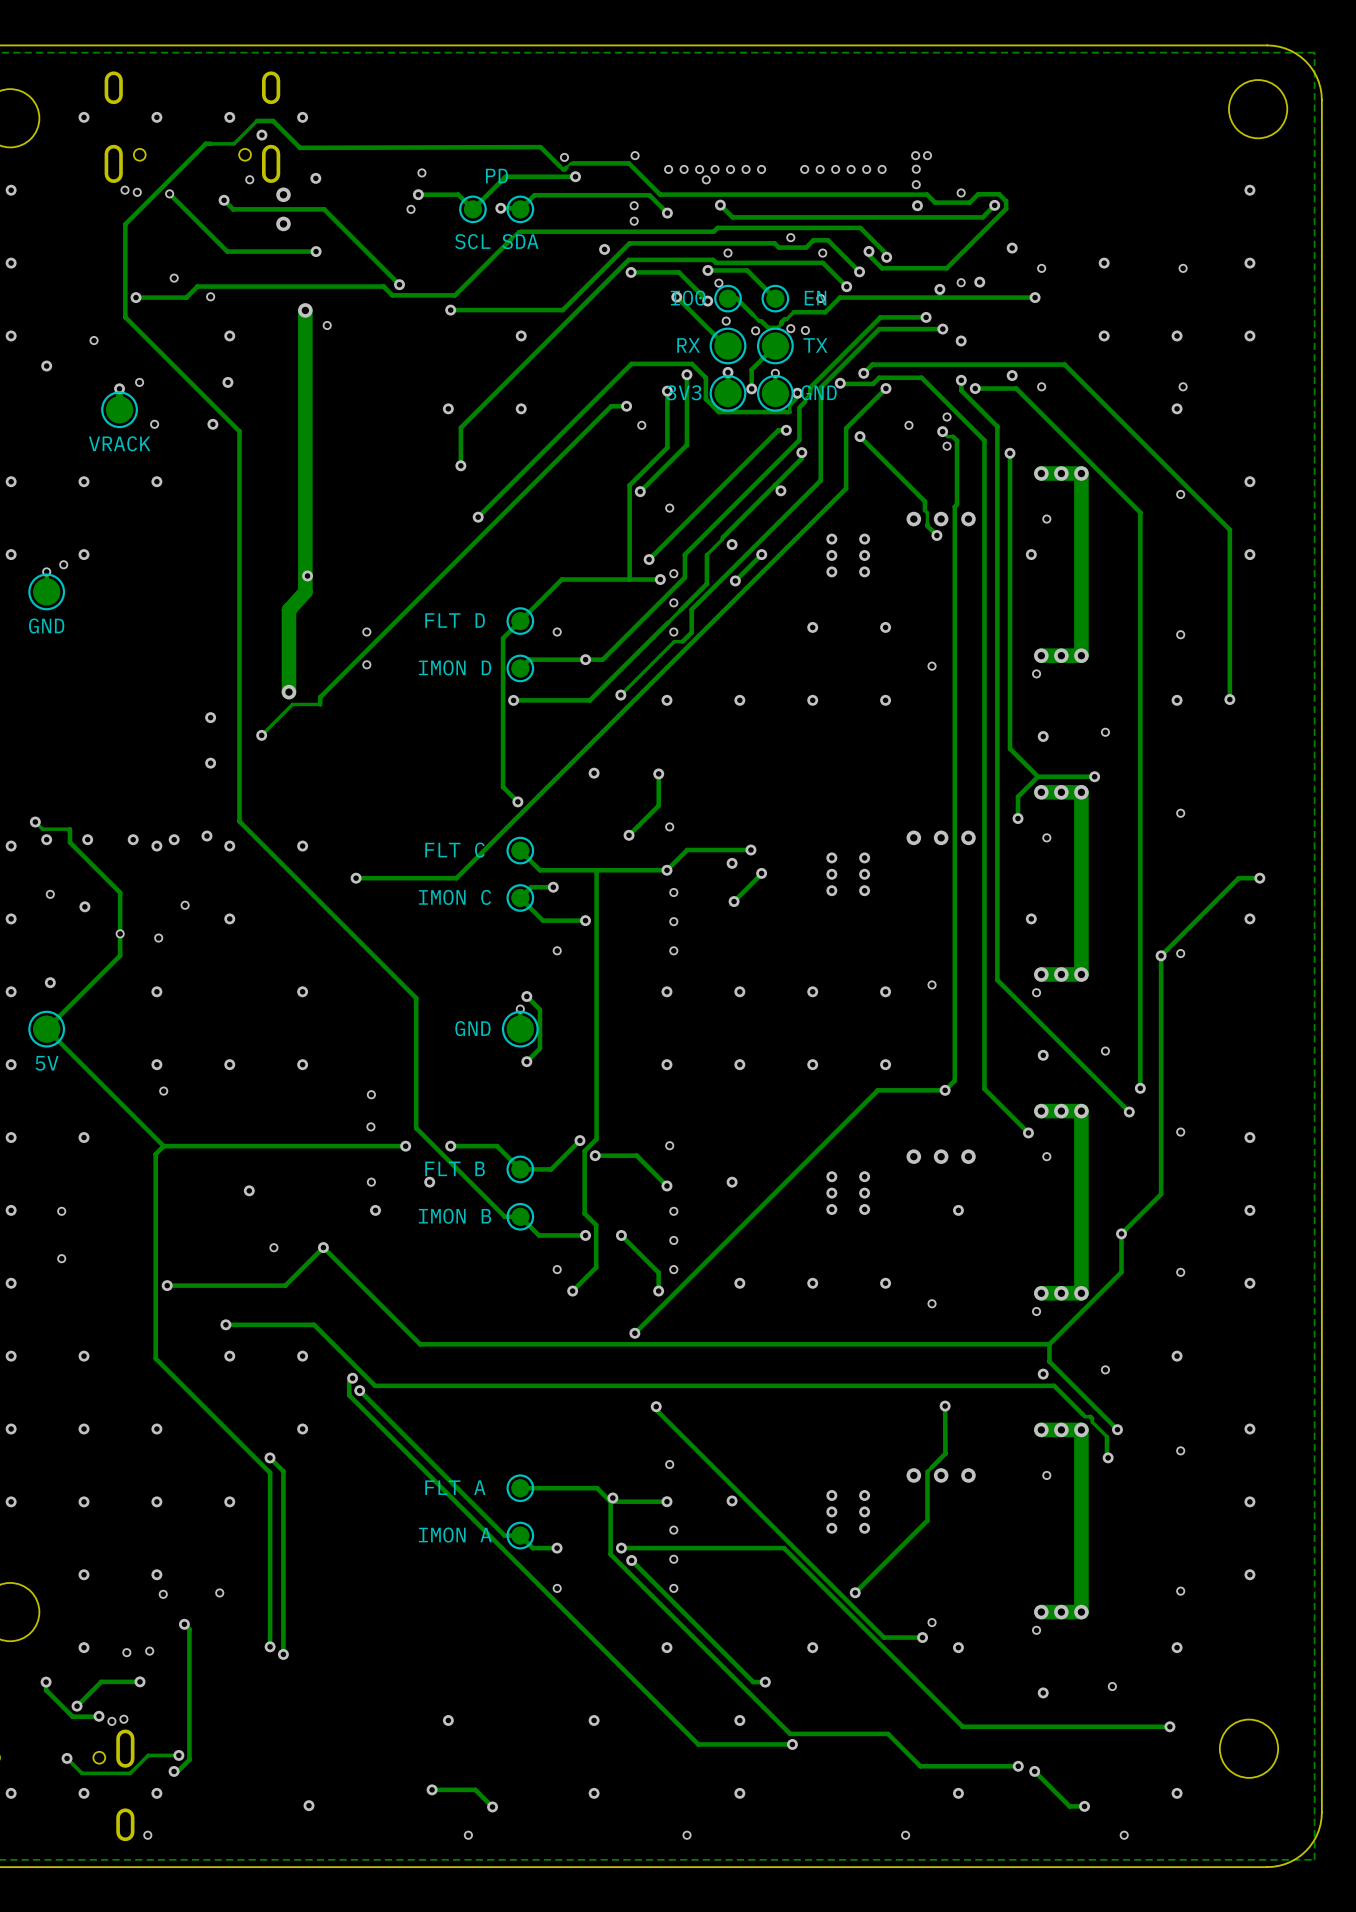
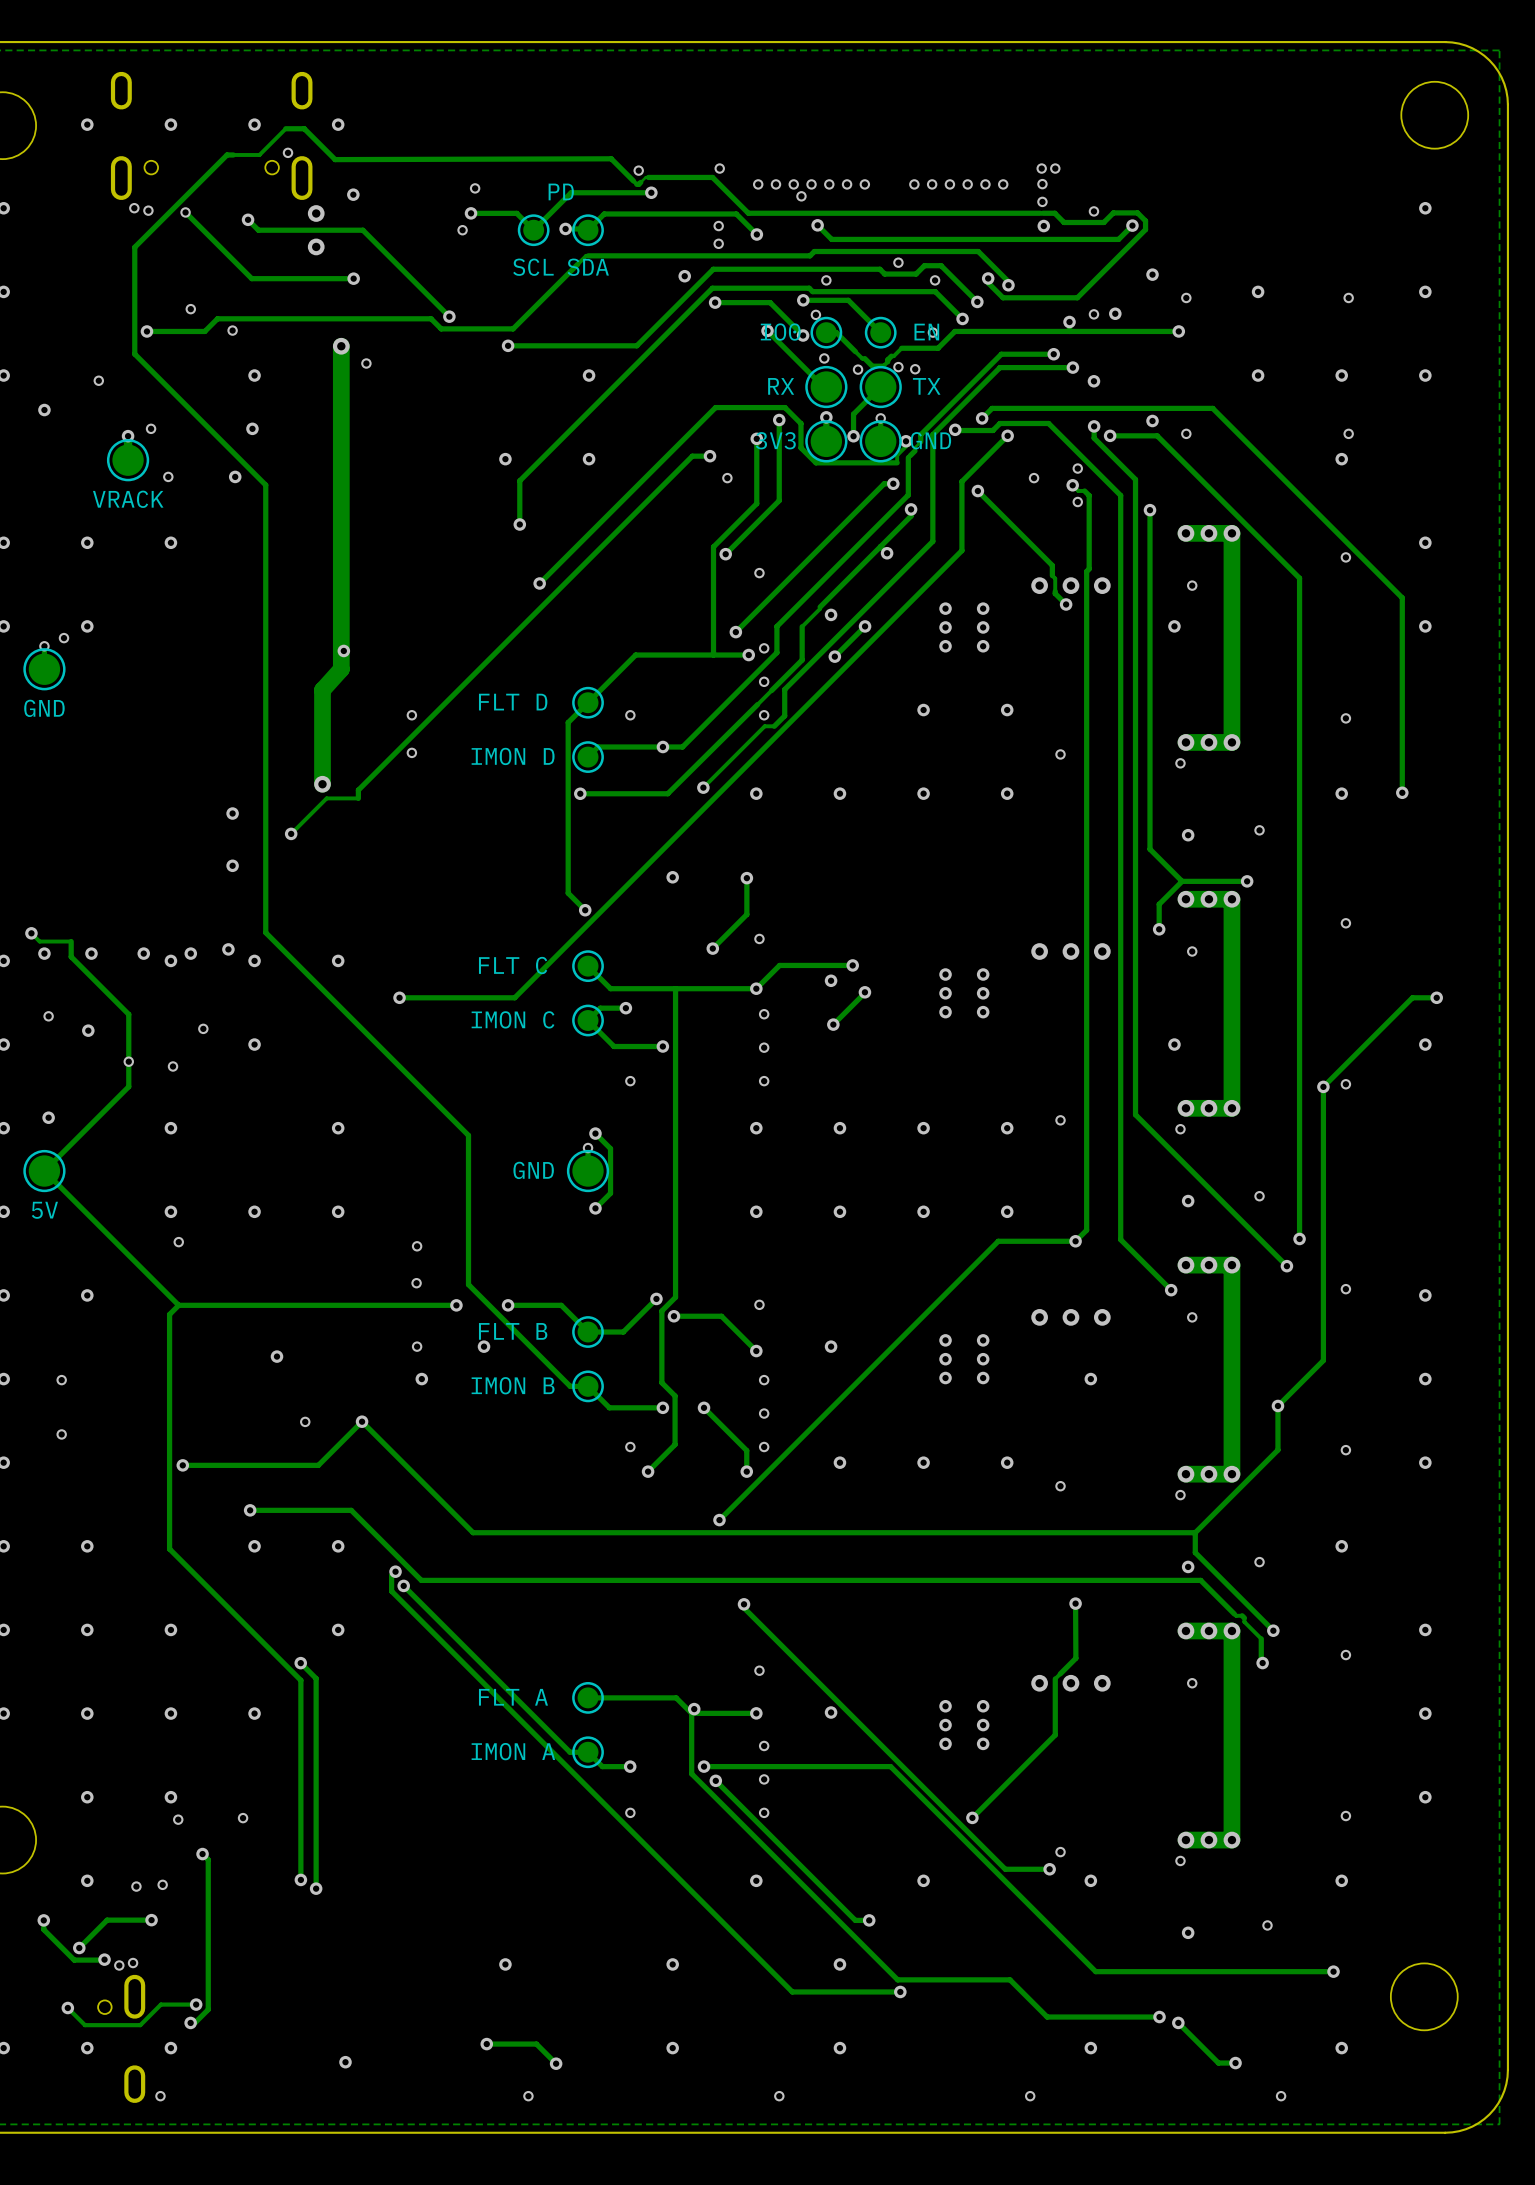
via: (261, 135) -> none
via position: (249, 179) -> (288, 152)

